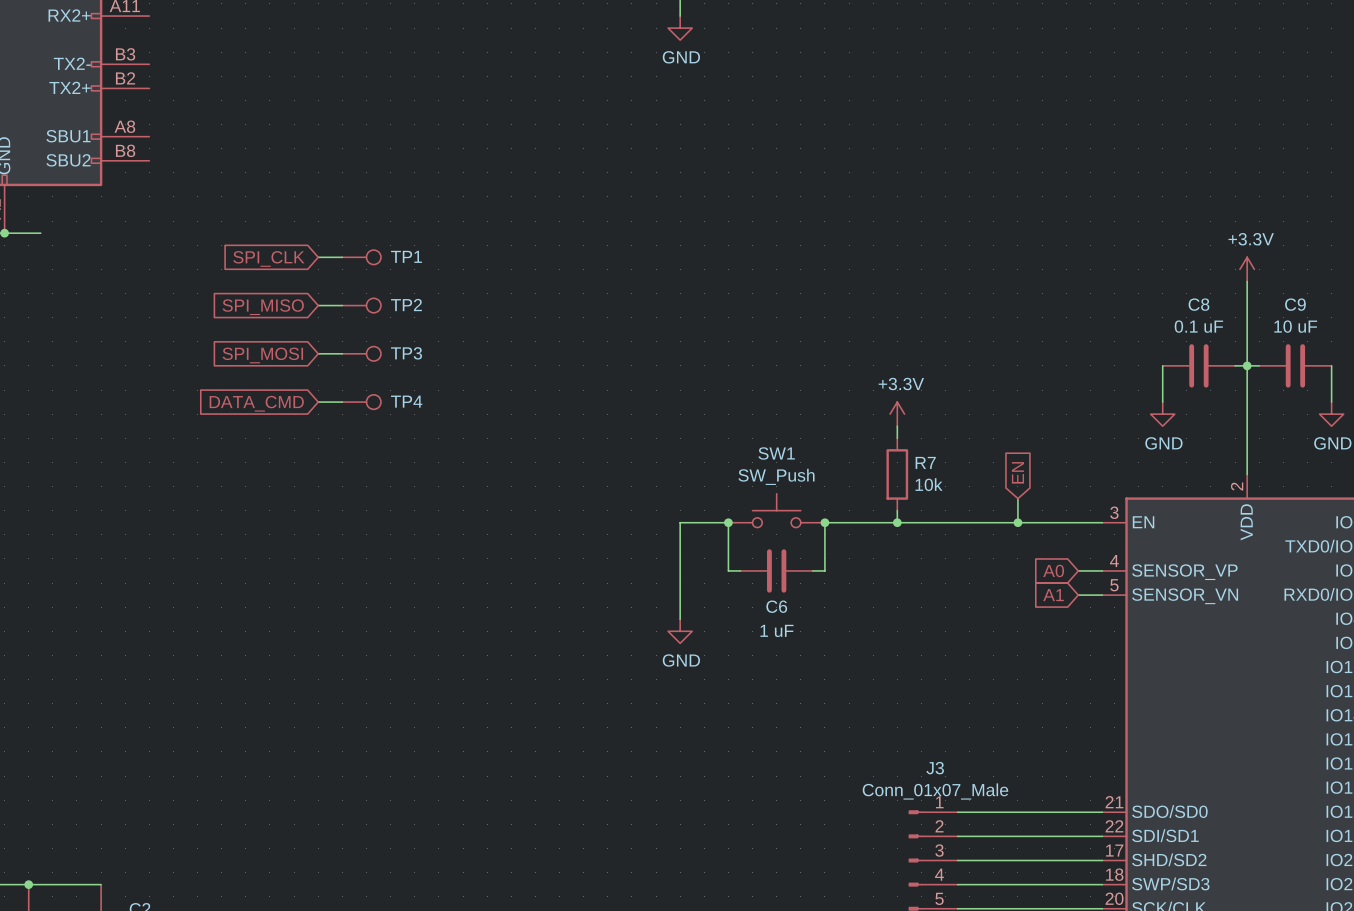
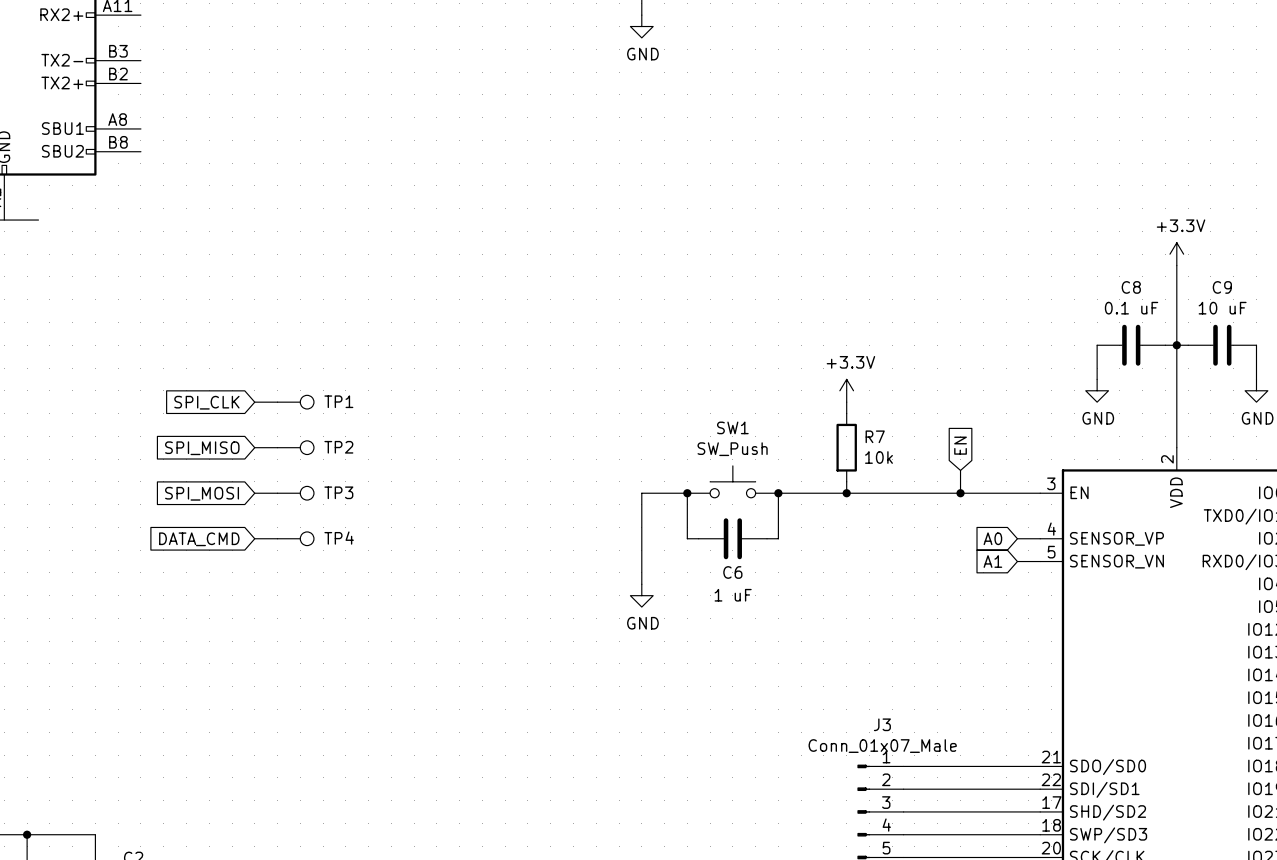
junction: (4, 233) -> none
wire: (318, 257) (342, 257) -> (254, 402) (277, 402)
TP1 position: (361, 257) -> (295, 402)
global label position: SPI_CLK (268, 258) -> SPI_CLK (206, 402)
wire: (318, 305) (342, 305) -> (254, 447) (277, 447)
TP2 position: (361, 305) -> (295, 447)
global label position: SPI_MISO (263, 307) -> SPI_MISO (202, 448)
wire: (318, 353) (342, 353) -> (254, 493) (277, 493)
TP3 position: (361, 353) -> (295, 493)
global label position: SPI_MOSI (262, 355) -> SPI_MOSI (202, 493)
wire: (318, 402) (342, 402) -> (254, 538) (277, 538)
TP4 position: (361, 402) -> (295, 538)
global label position: DATA_CMD (256, 403) -> DATA_CMD (199, 539)

